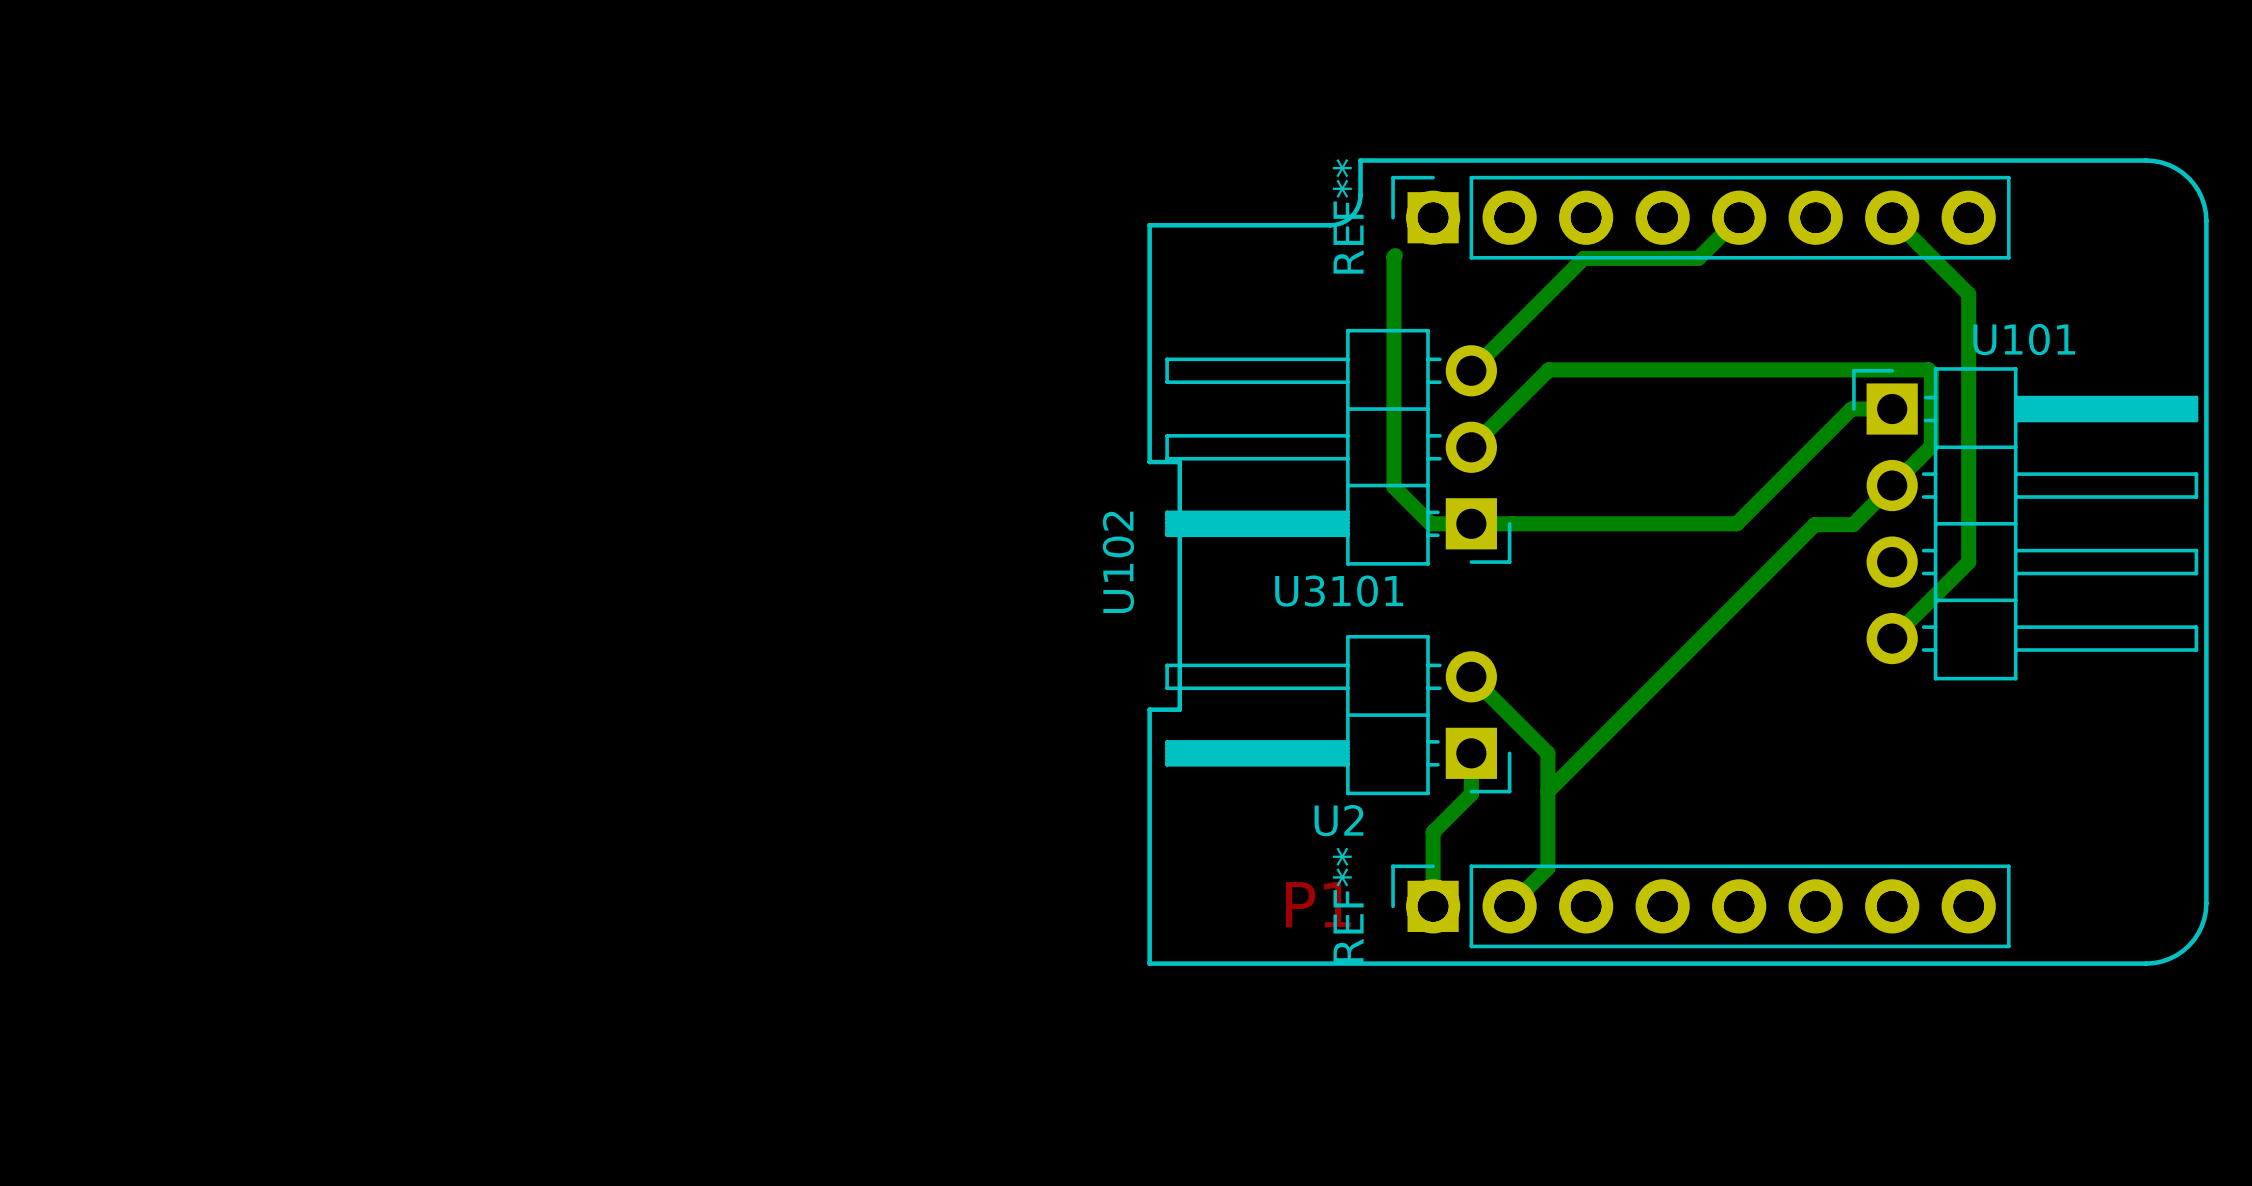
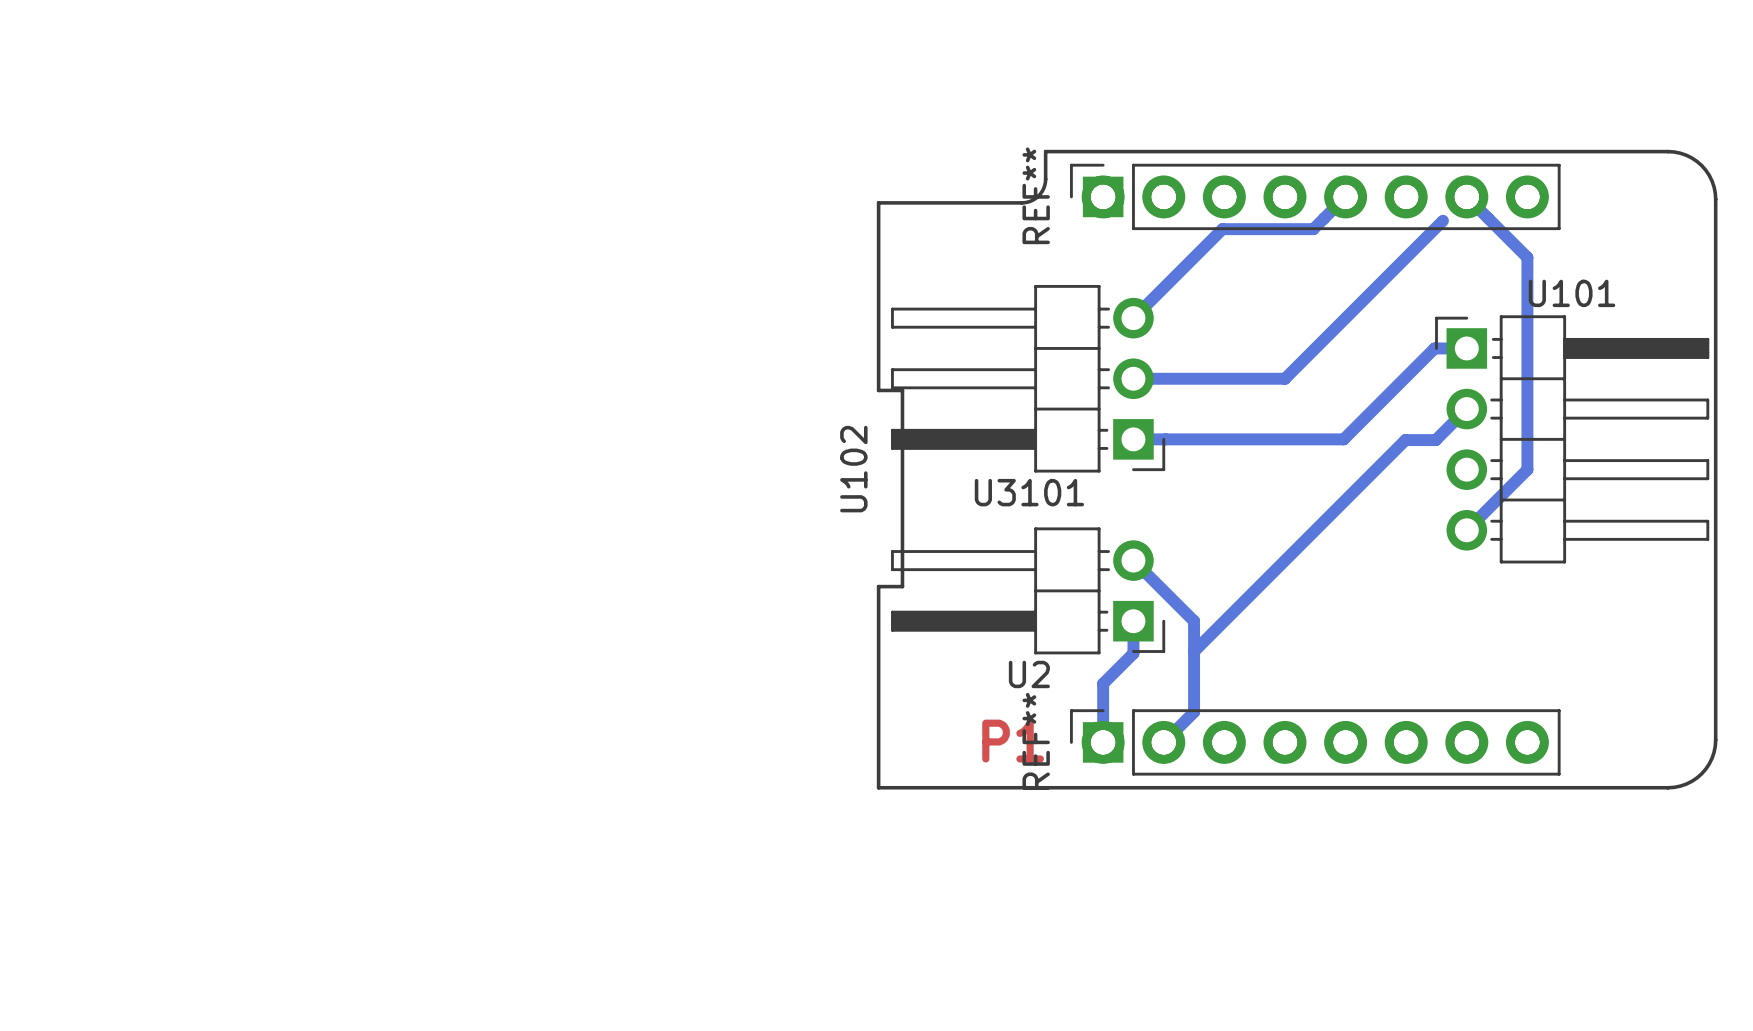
bottom track: (1395, 255) (1393, 487) (1430, 523) (1471, 523) -> none
bottom track: (1471, 447) (1548, 369) (1928, 369) (1931, 372) (1931, 446) (1892, 485) -> (1133, 378) (1284, 378) (1442, 220)

